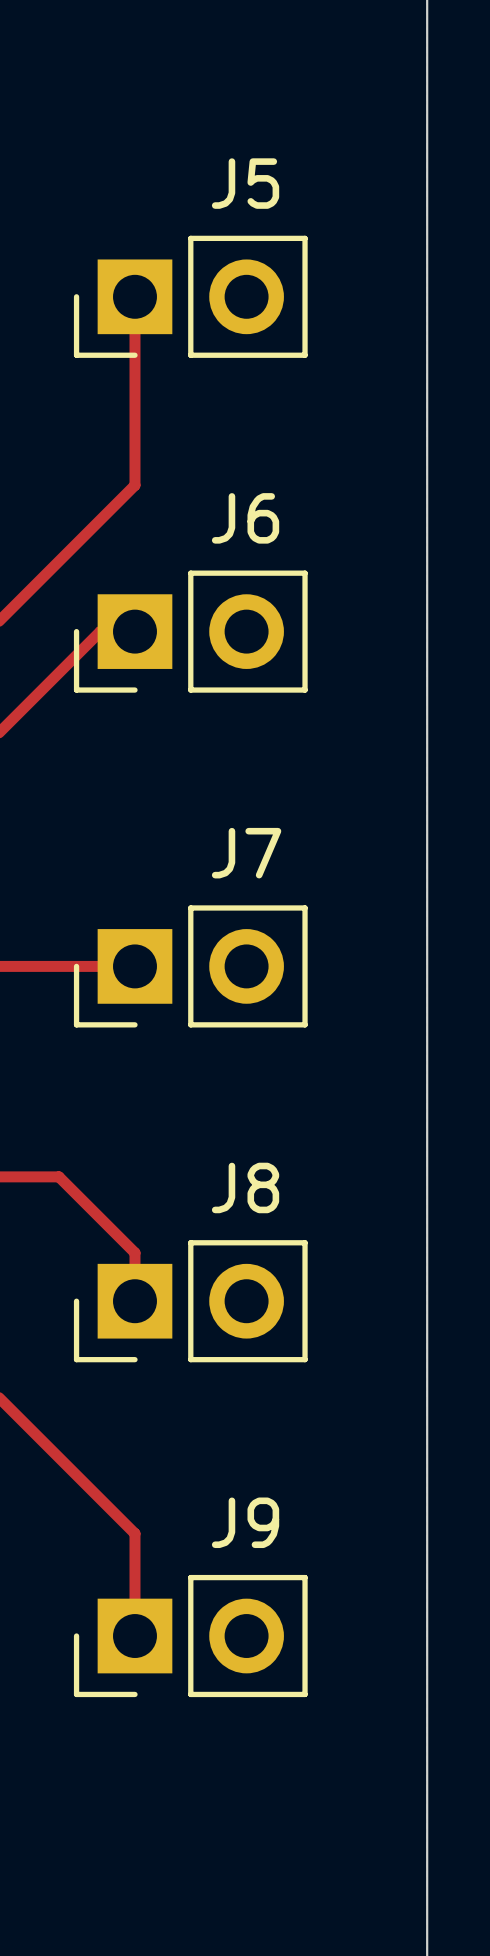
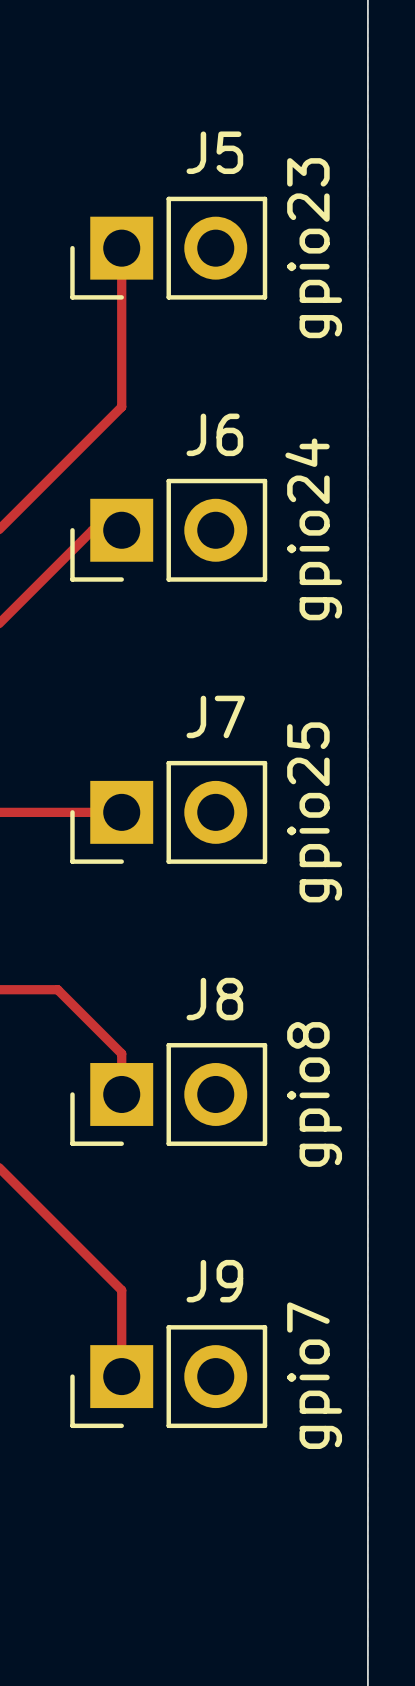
text: none -> gpio23 (314, 248)
text: none -> gpio24 (313, 529)
text: none -> gpio25 (314, 812)
text: none -> gpio8 (314, 1094)
text: none -> gpio7 (314, 1375)

